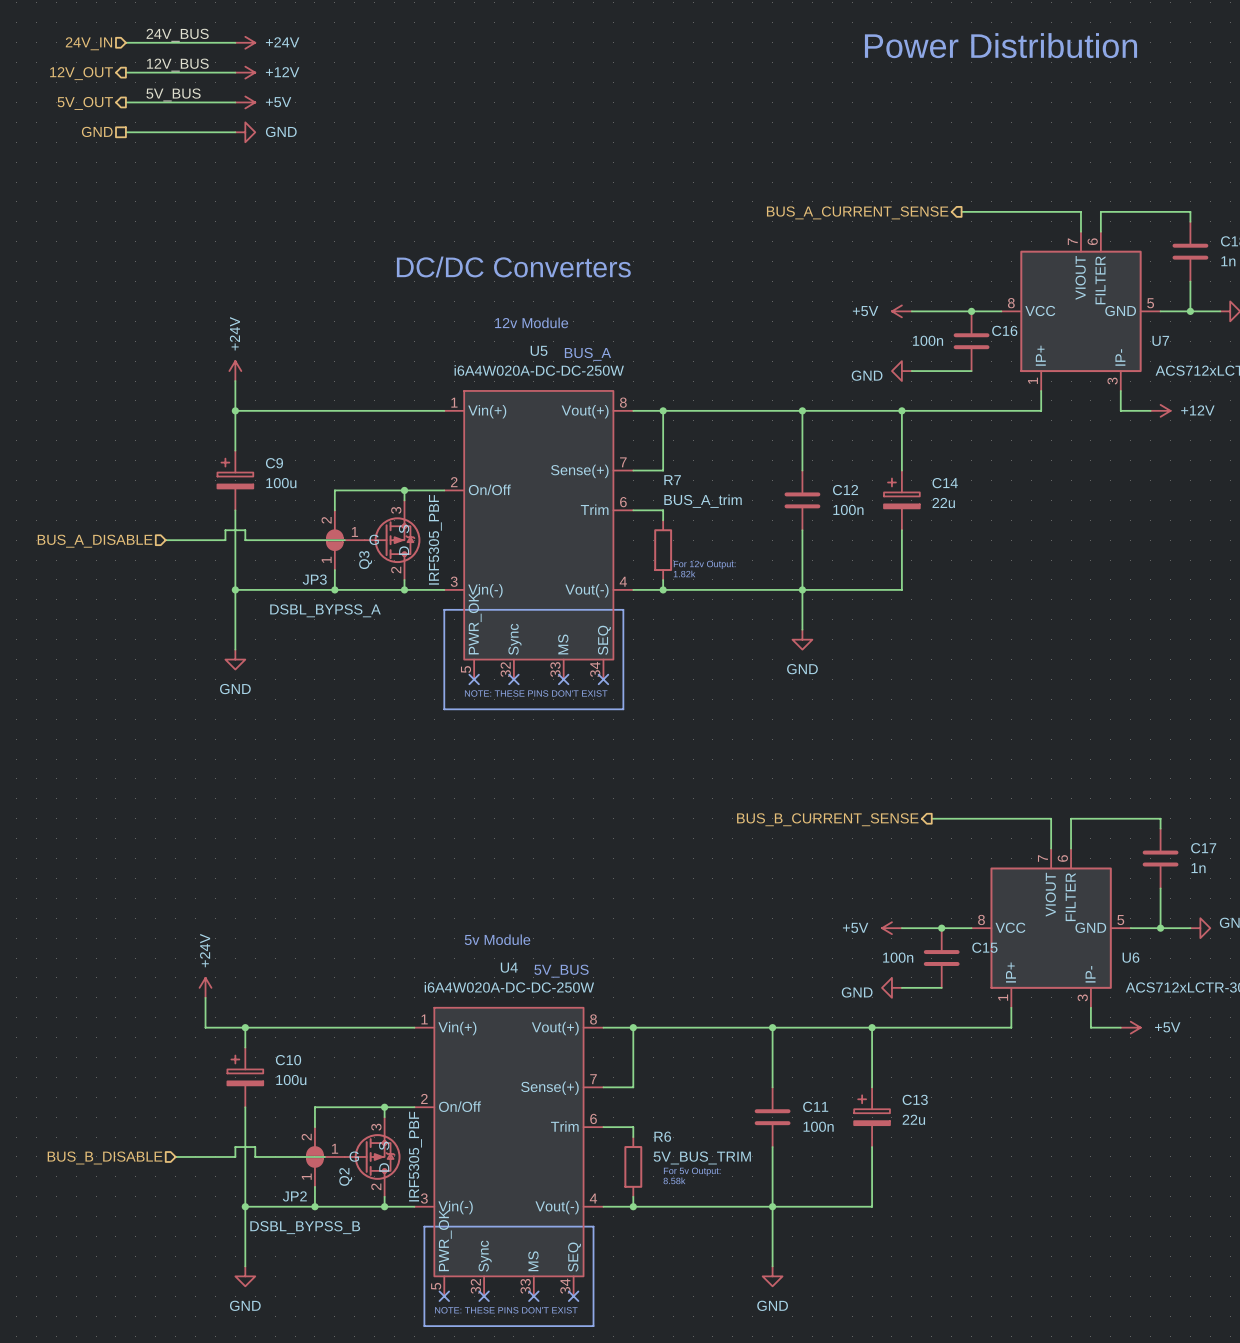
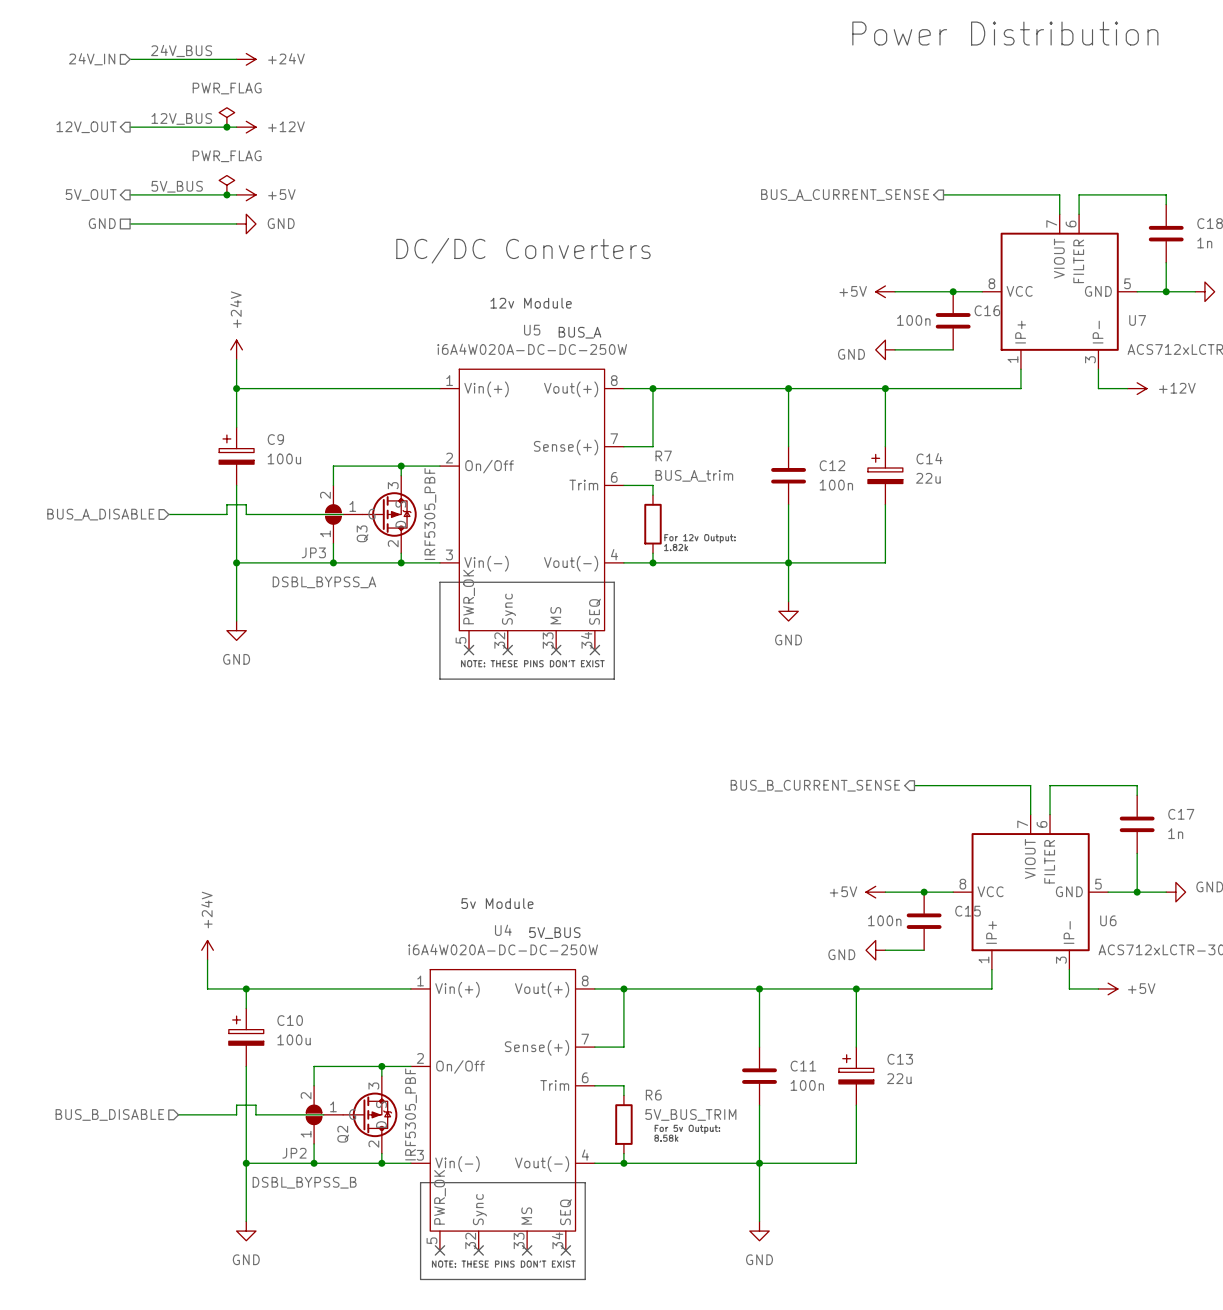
label: 24V_BUS (177, 35) -> none
wire: (125, 42) (235, 42) -> (130, 127) (236, 127)
power symbol: +24V (245, 42) -> none
hierarchical label: 24V_IN (88, 43) -> none
label: 12V_BUS (177, 65) -> 24V_BUS (181, 50)
power symbol: +12V (245, 72) -> +24V (246, 59)
hierarchical label shape: output (81, 73) -> input (92, 59)
hierarchical label: 12V_OUT (81, 73) -> 24V_IN (92, 59)
label position: 5V_BUS (173, 94) -> 5V_BUS (177, 186)
wire: (125, 102) (235, 102) -> (130, 194) (236, 194)
power symbol position: +5V (245, 102) -> +5V (246, 194)
hierarchical label position: 5V_OUT (85, 103) -> 5V_OUT (91, 195)
hierarchical label position: GND (97, 131) -> GND (102, 223)
wire: (125, 132) (235, 132) -> (130, 223) (236, 223)
power symbol: none -> PWR_FLAG (226, 117)
power symbol position: GND (245, 132) -> GND (246, 223)
label: none -> 12V_BUS (181, 118)
junction: none -> (226, 127)
power symbol: none -> +12V (246, 127)
hierarchical label: none -> 12V_OUT (86, 127)
power symbol: none -> PWR_FLAG (226, 185)
junction: none -> (226, 194)

